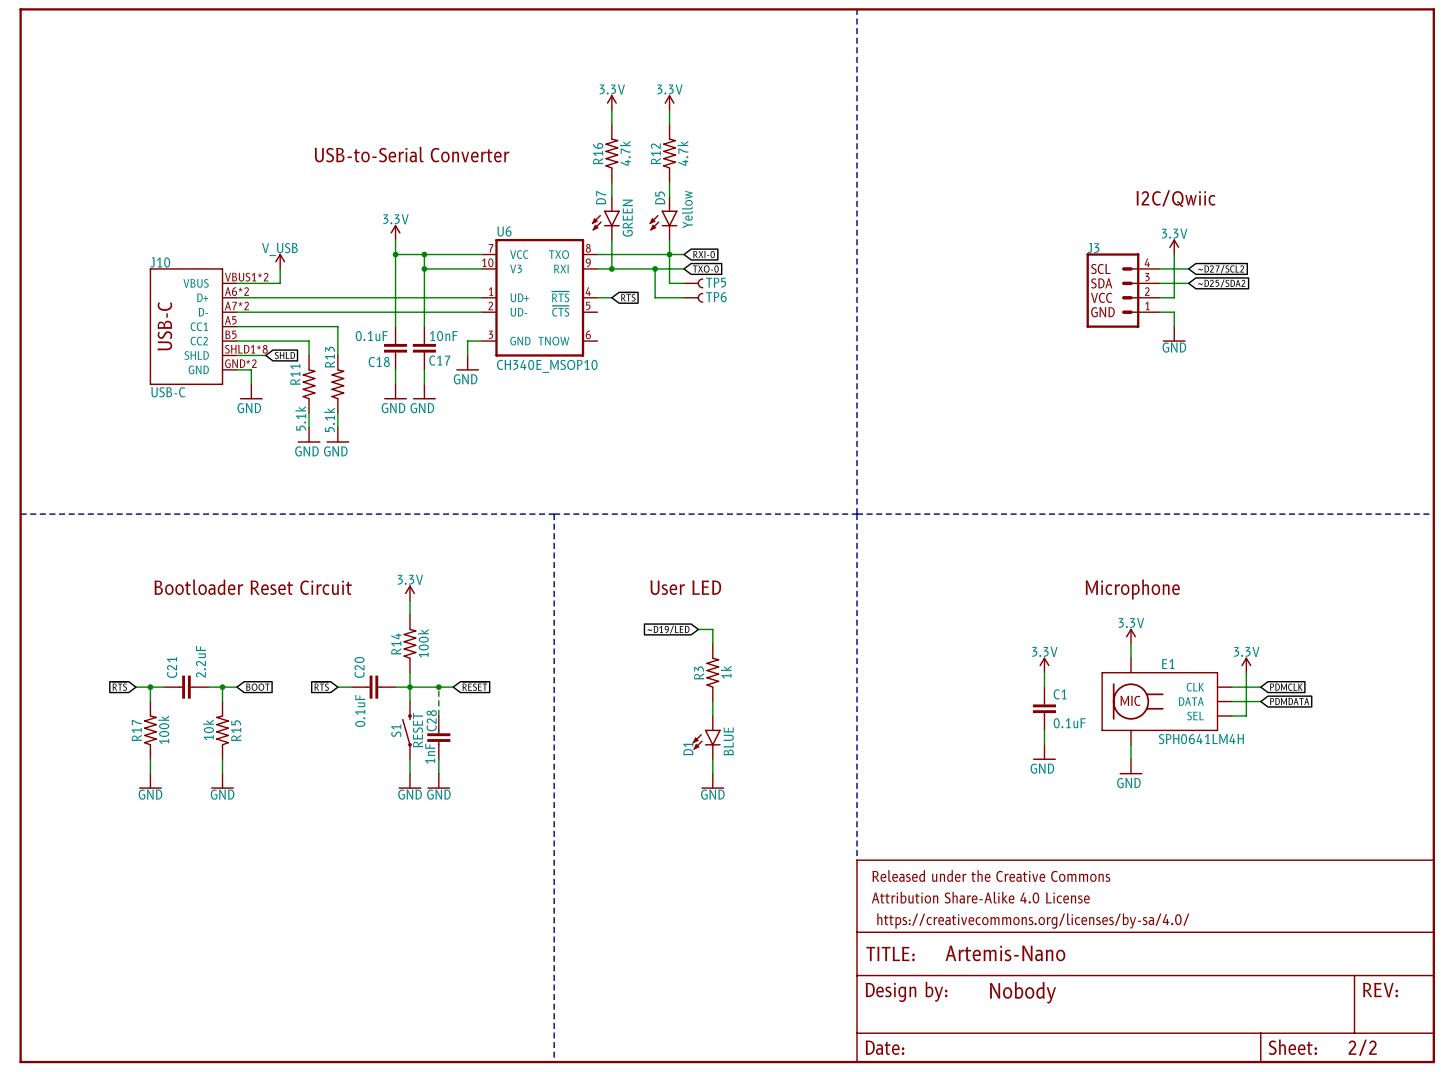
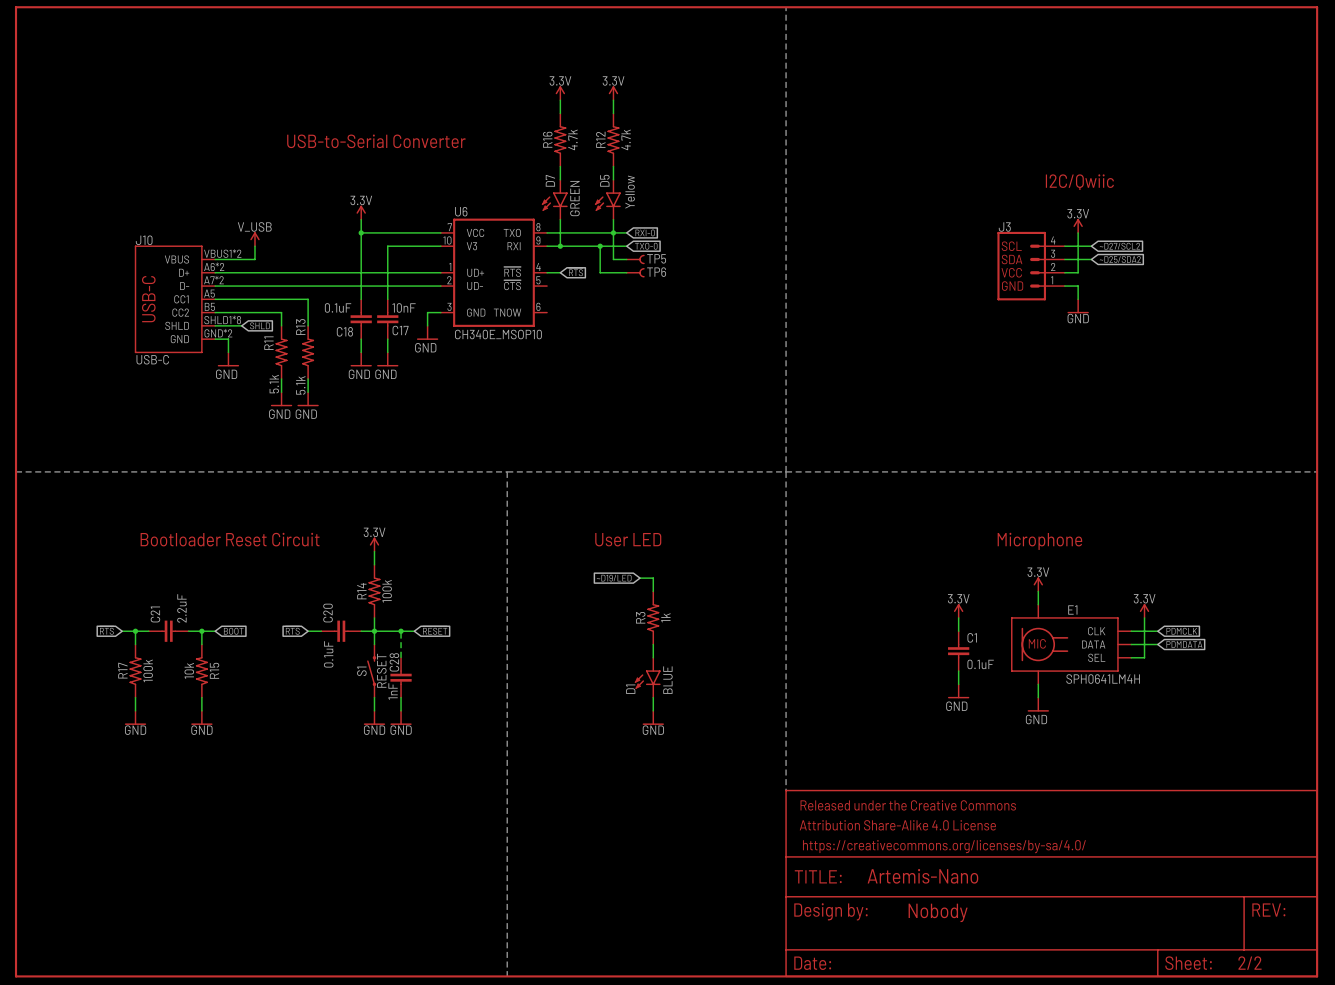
wire: (424, 254) (424, 268) -> none
junction: (424, 254) -> none
junction: (424, 268) -> none

